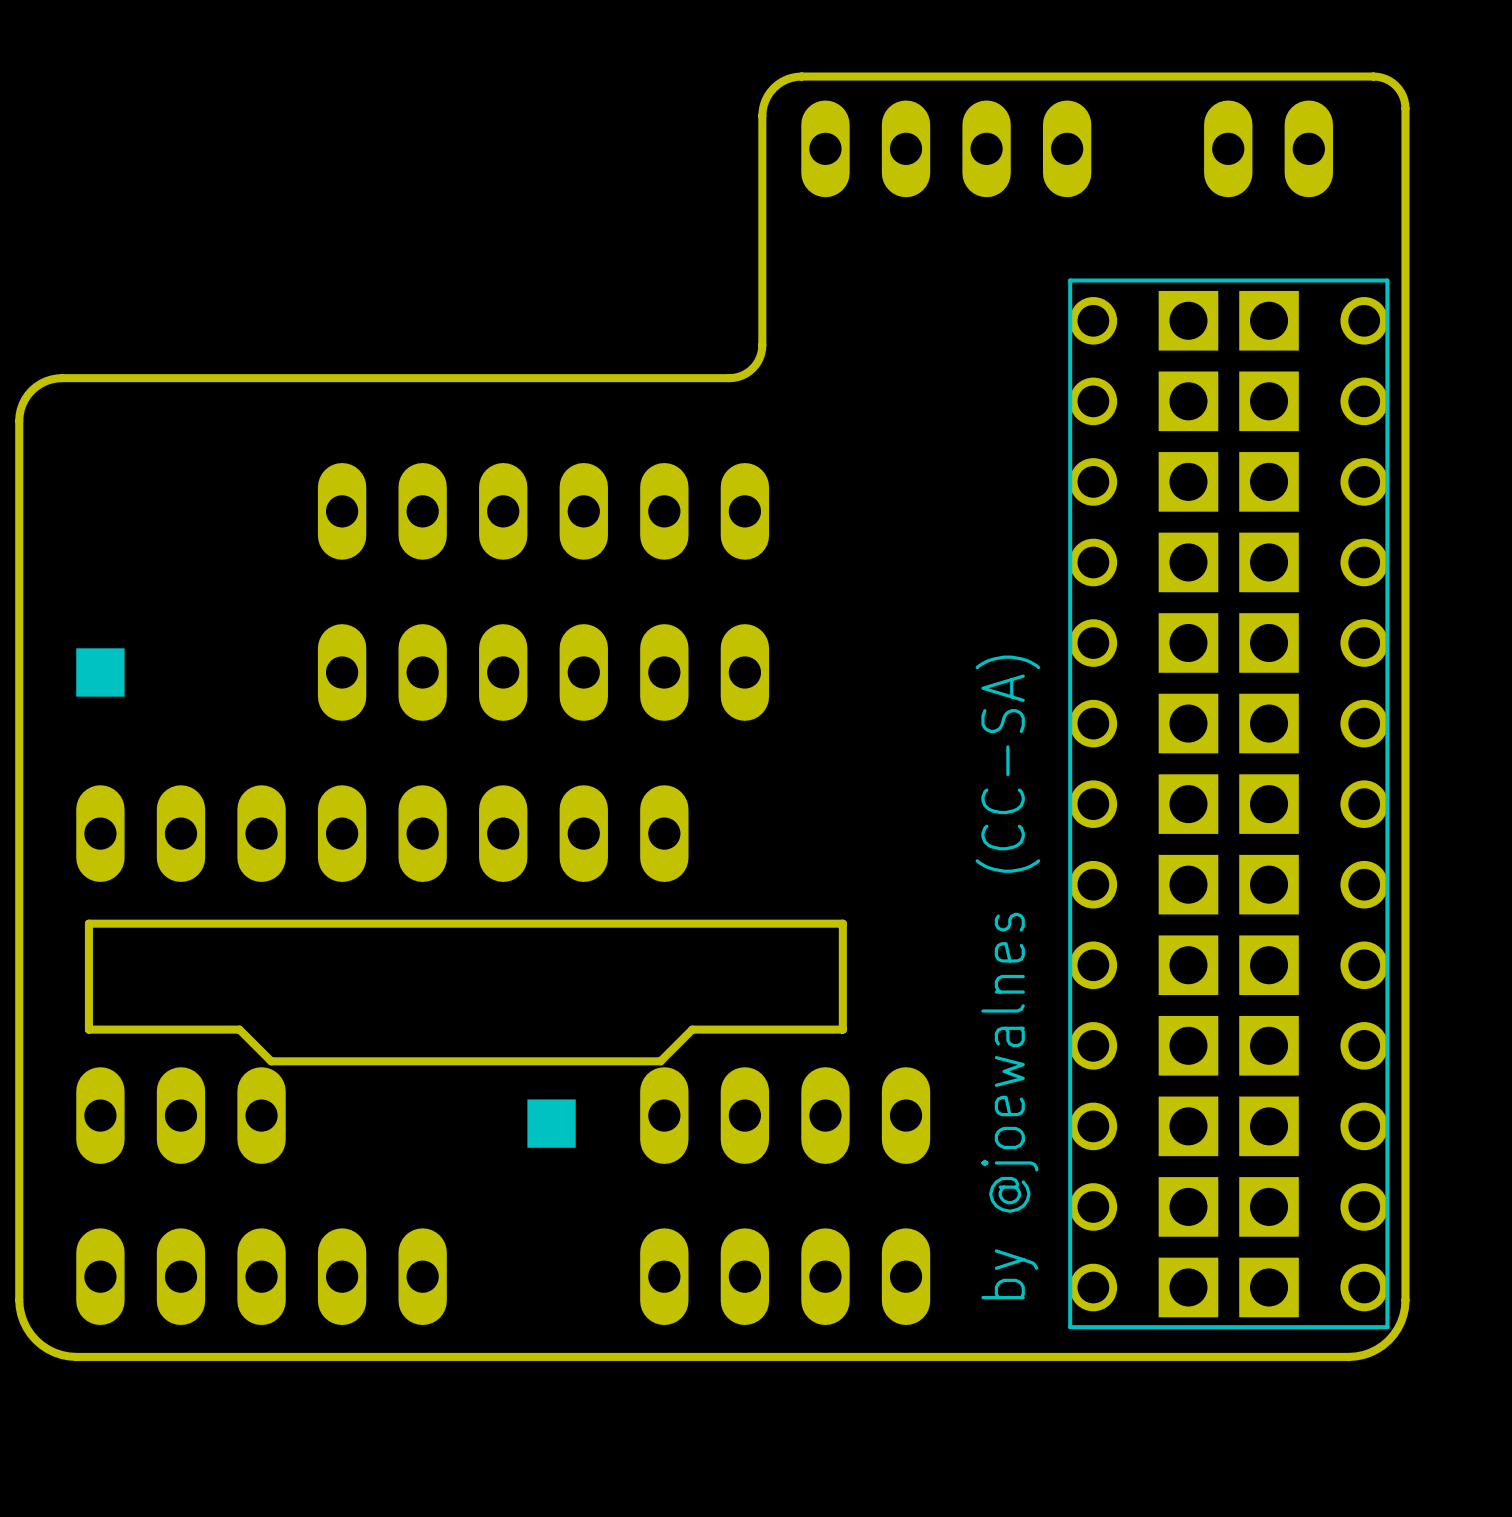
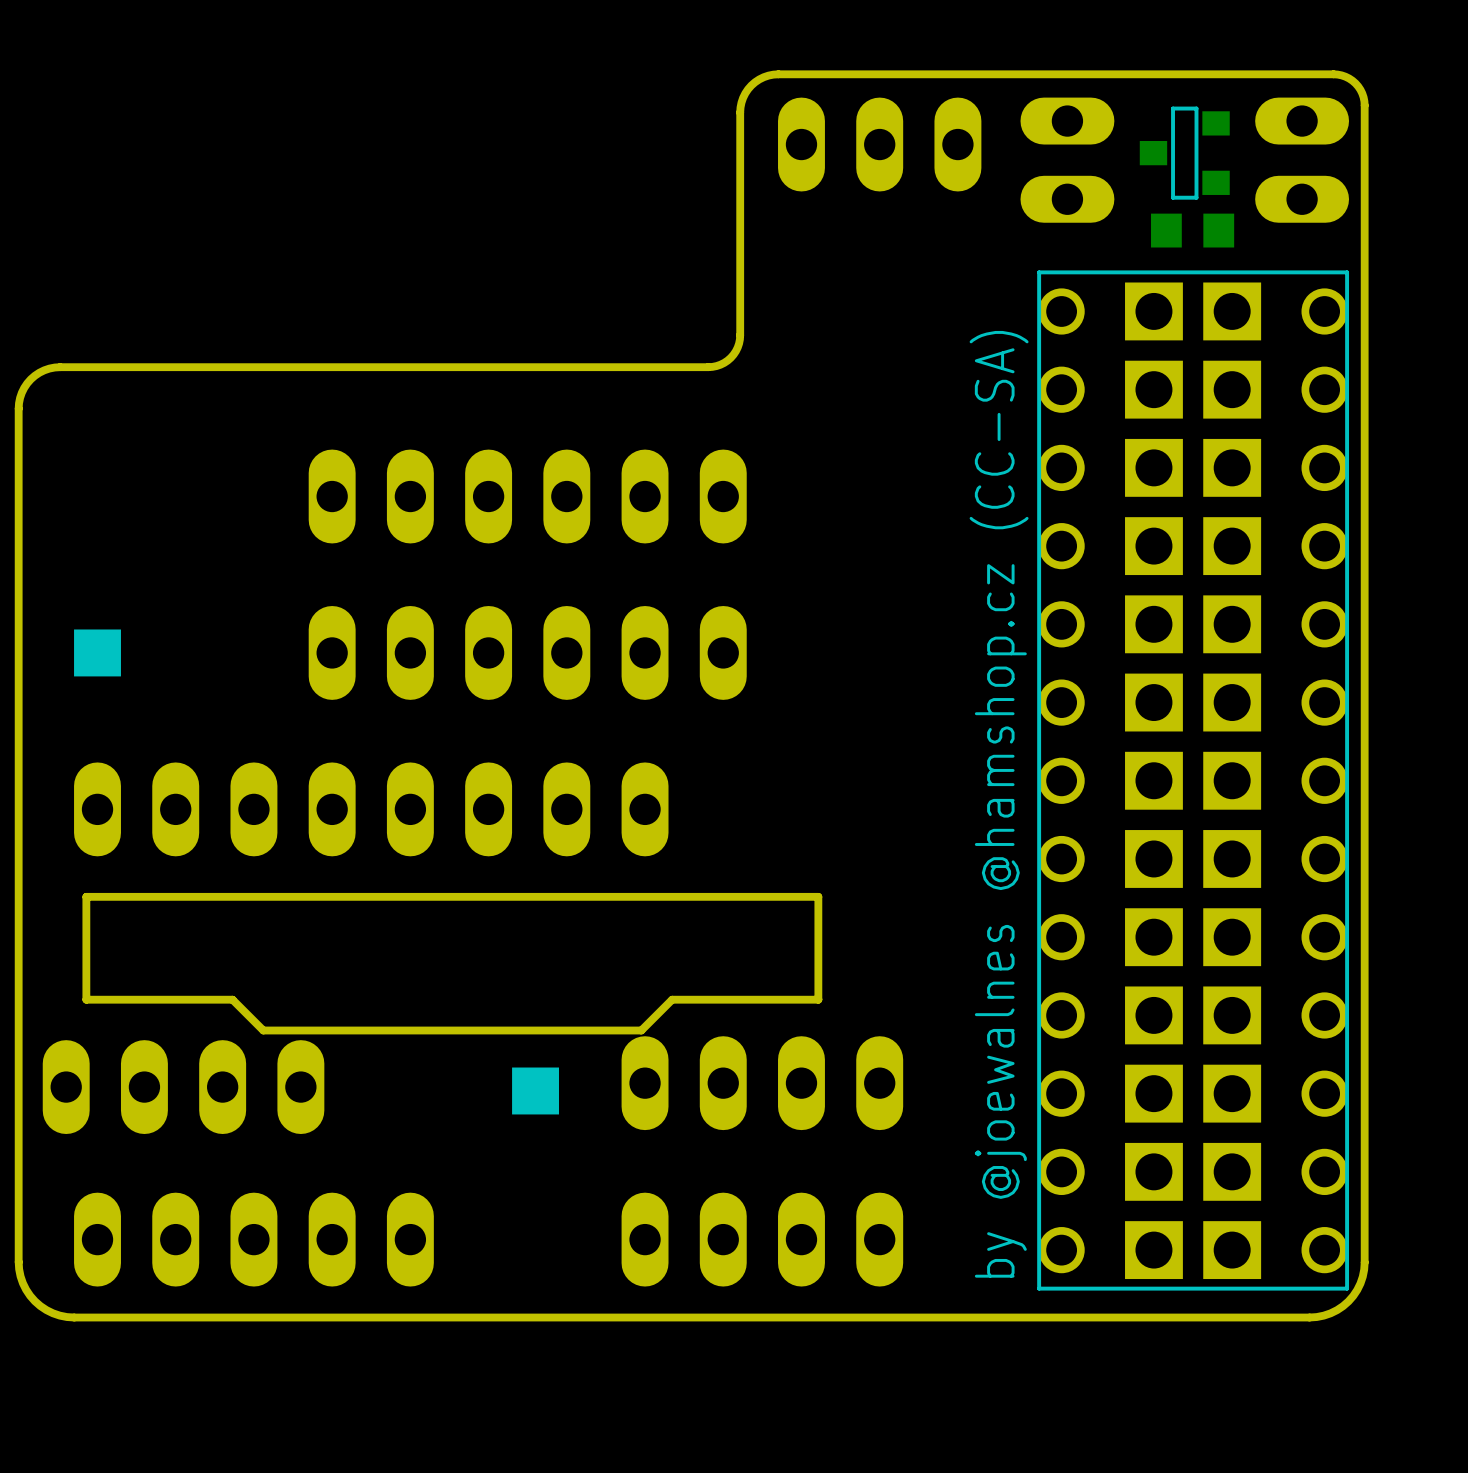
part: (946, 148) -> none
part rotation: 0° (1268, 148) -> 90° clockwise (1302, 160)
part: none -> (1184, 153)
part: none -> (1067, 160)
part: none -> (1192, 230)
text: by @joewalnes (CC-SA) (1007, 977) -> by @joewalnes @hamshop.cz (CC-SA) (999, 804)
part footprint: [76, 1067, 286, 1164] -> [42, 1040, 325, 1135]

